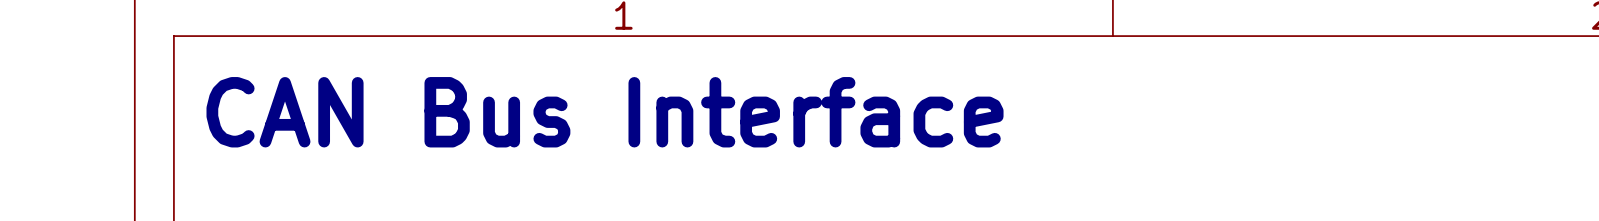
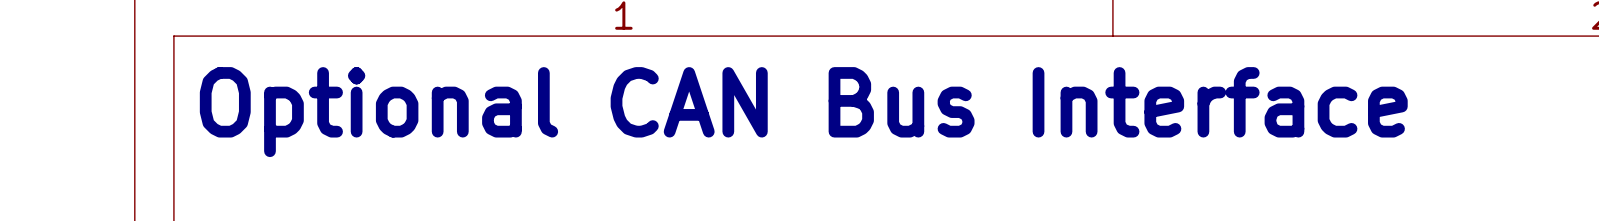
text: CAN Bus Interface (605, 112) -> Optional CAN Bus Interface (803, 112)

